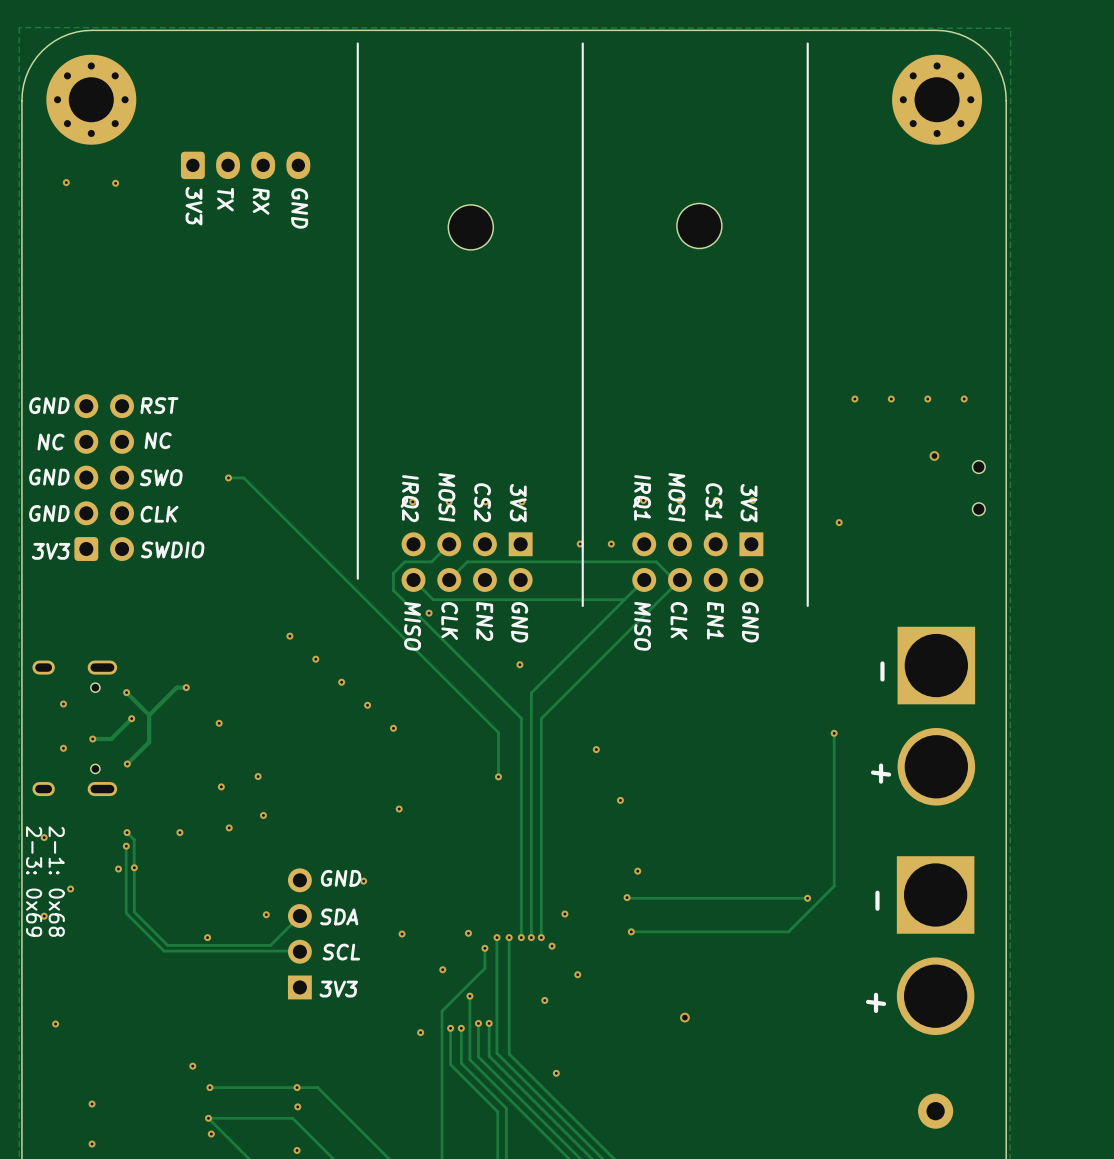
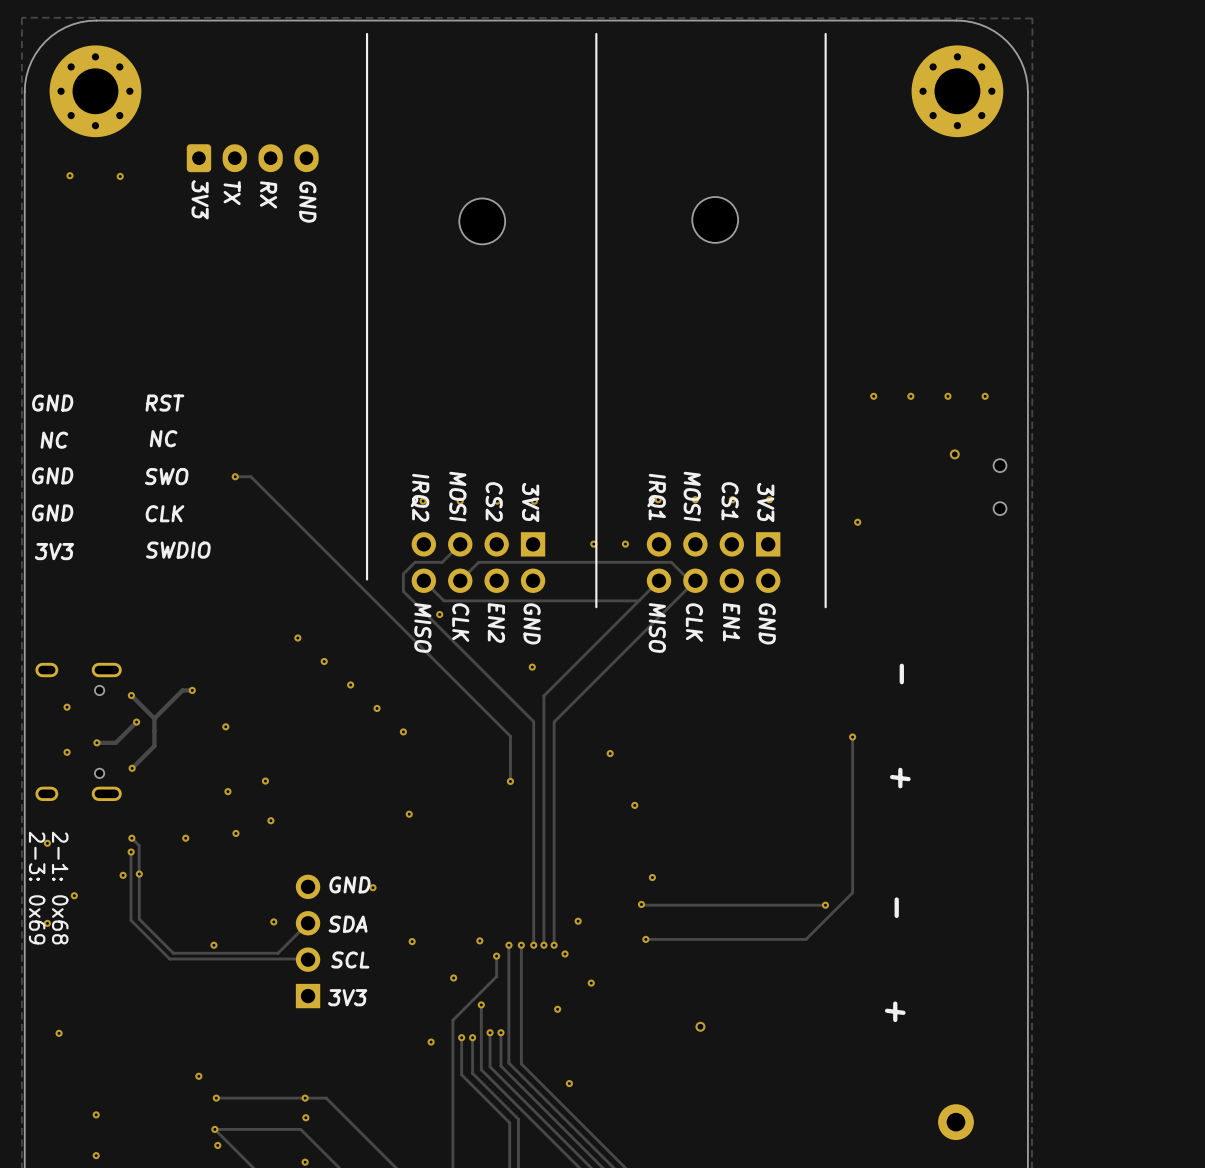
part: (104, 477) -> none
part: (936, 716) -> none
part: (935, 945) -> none

